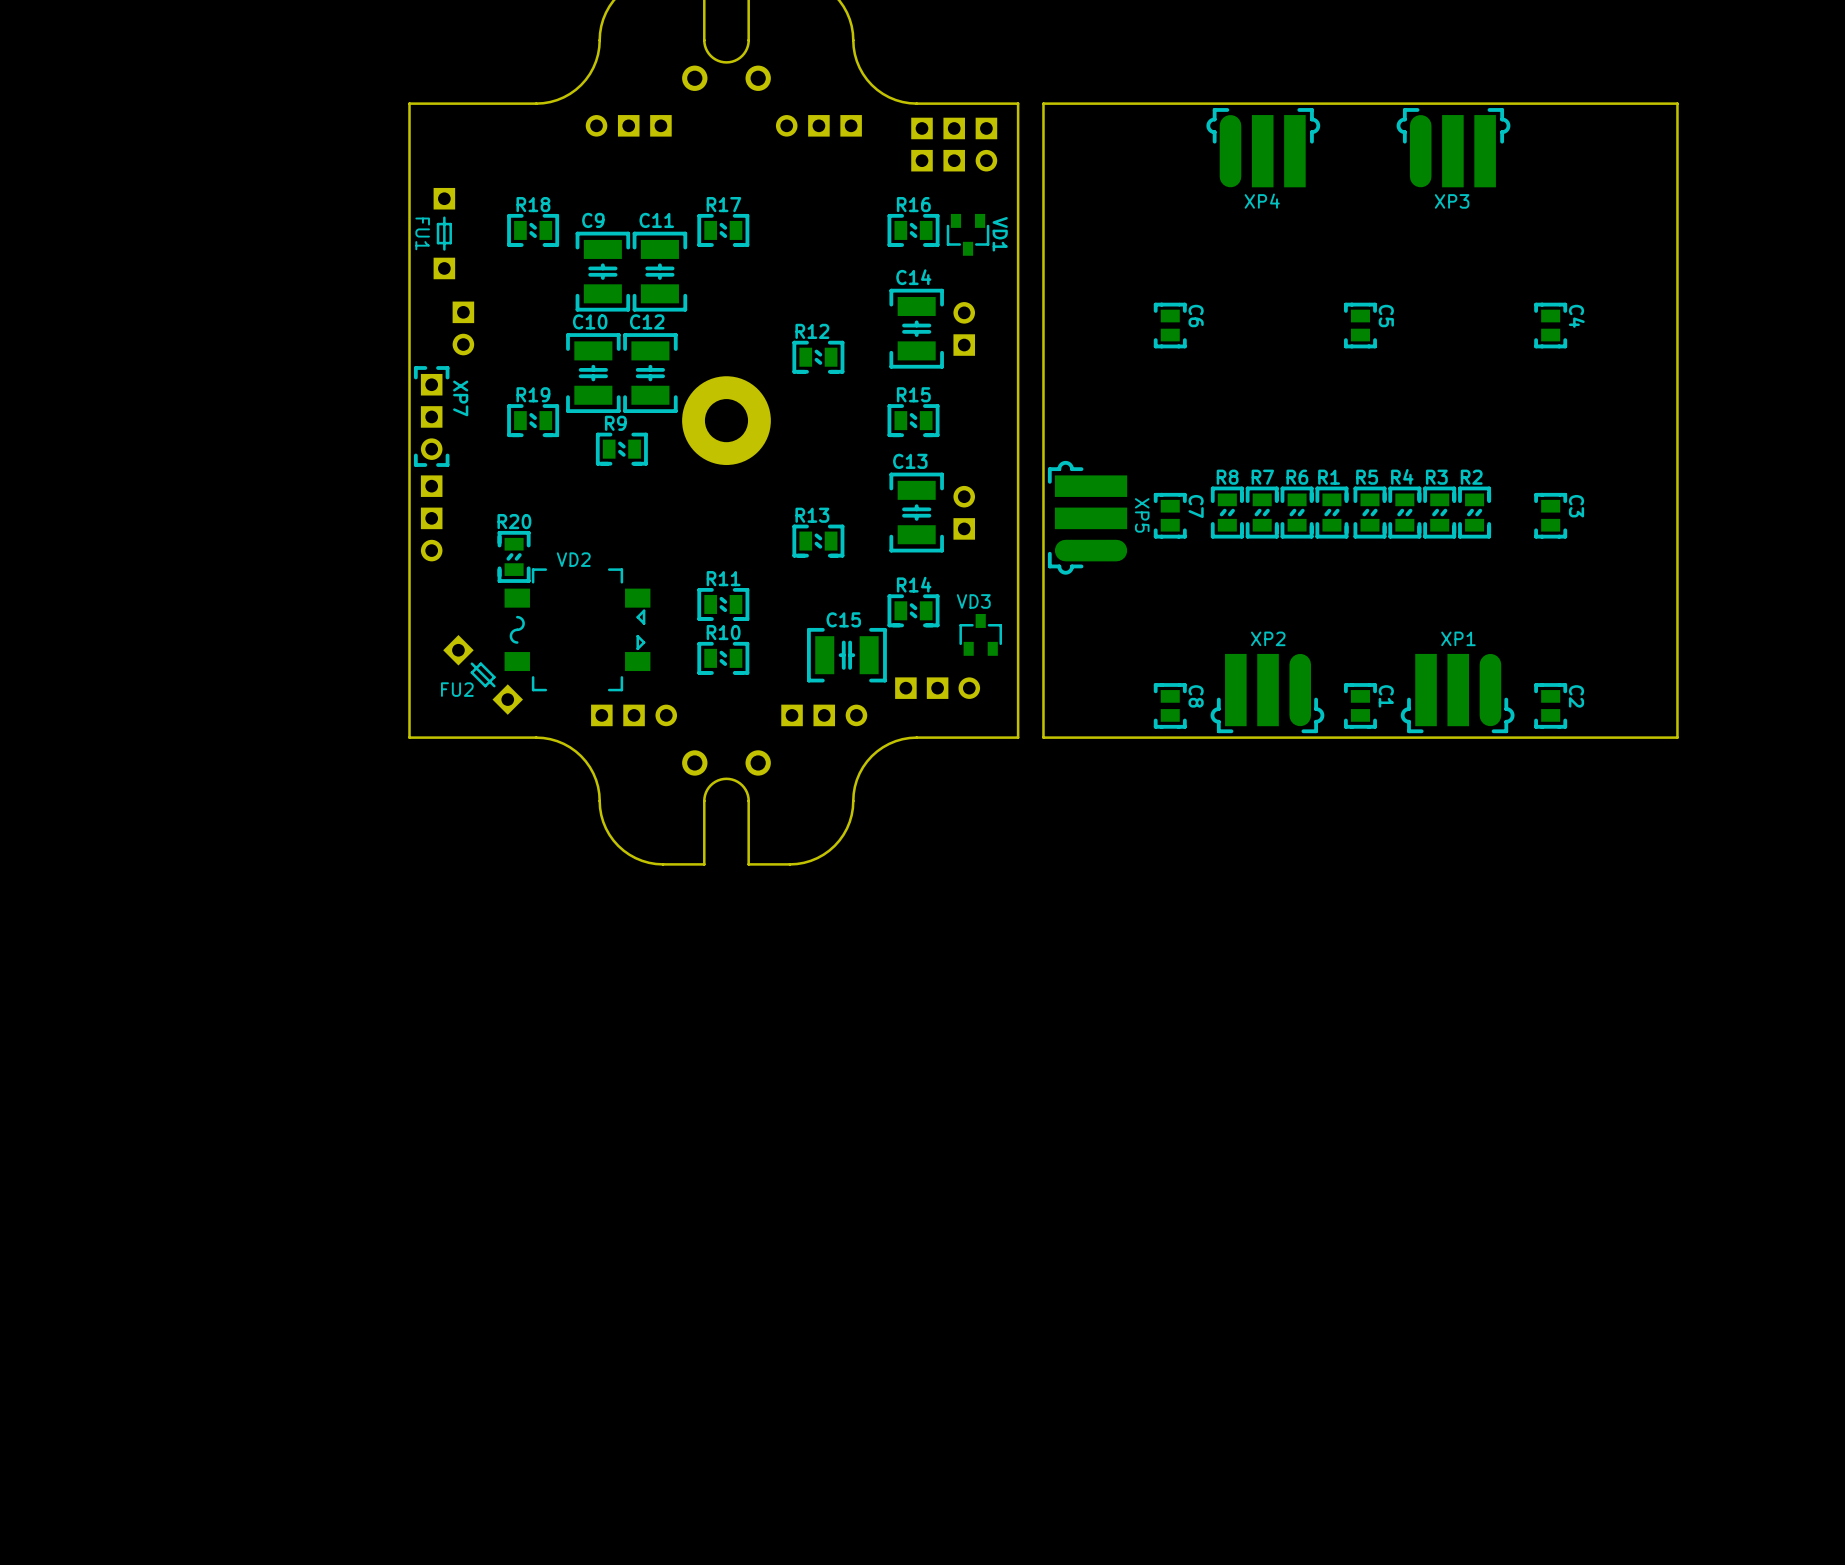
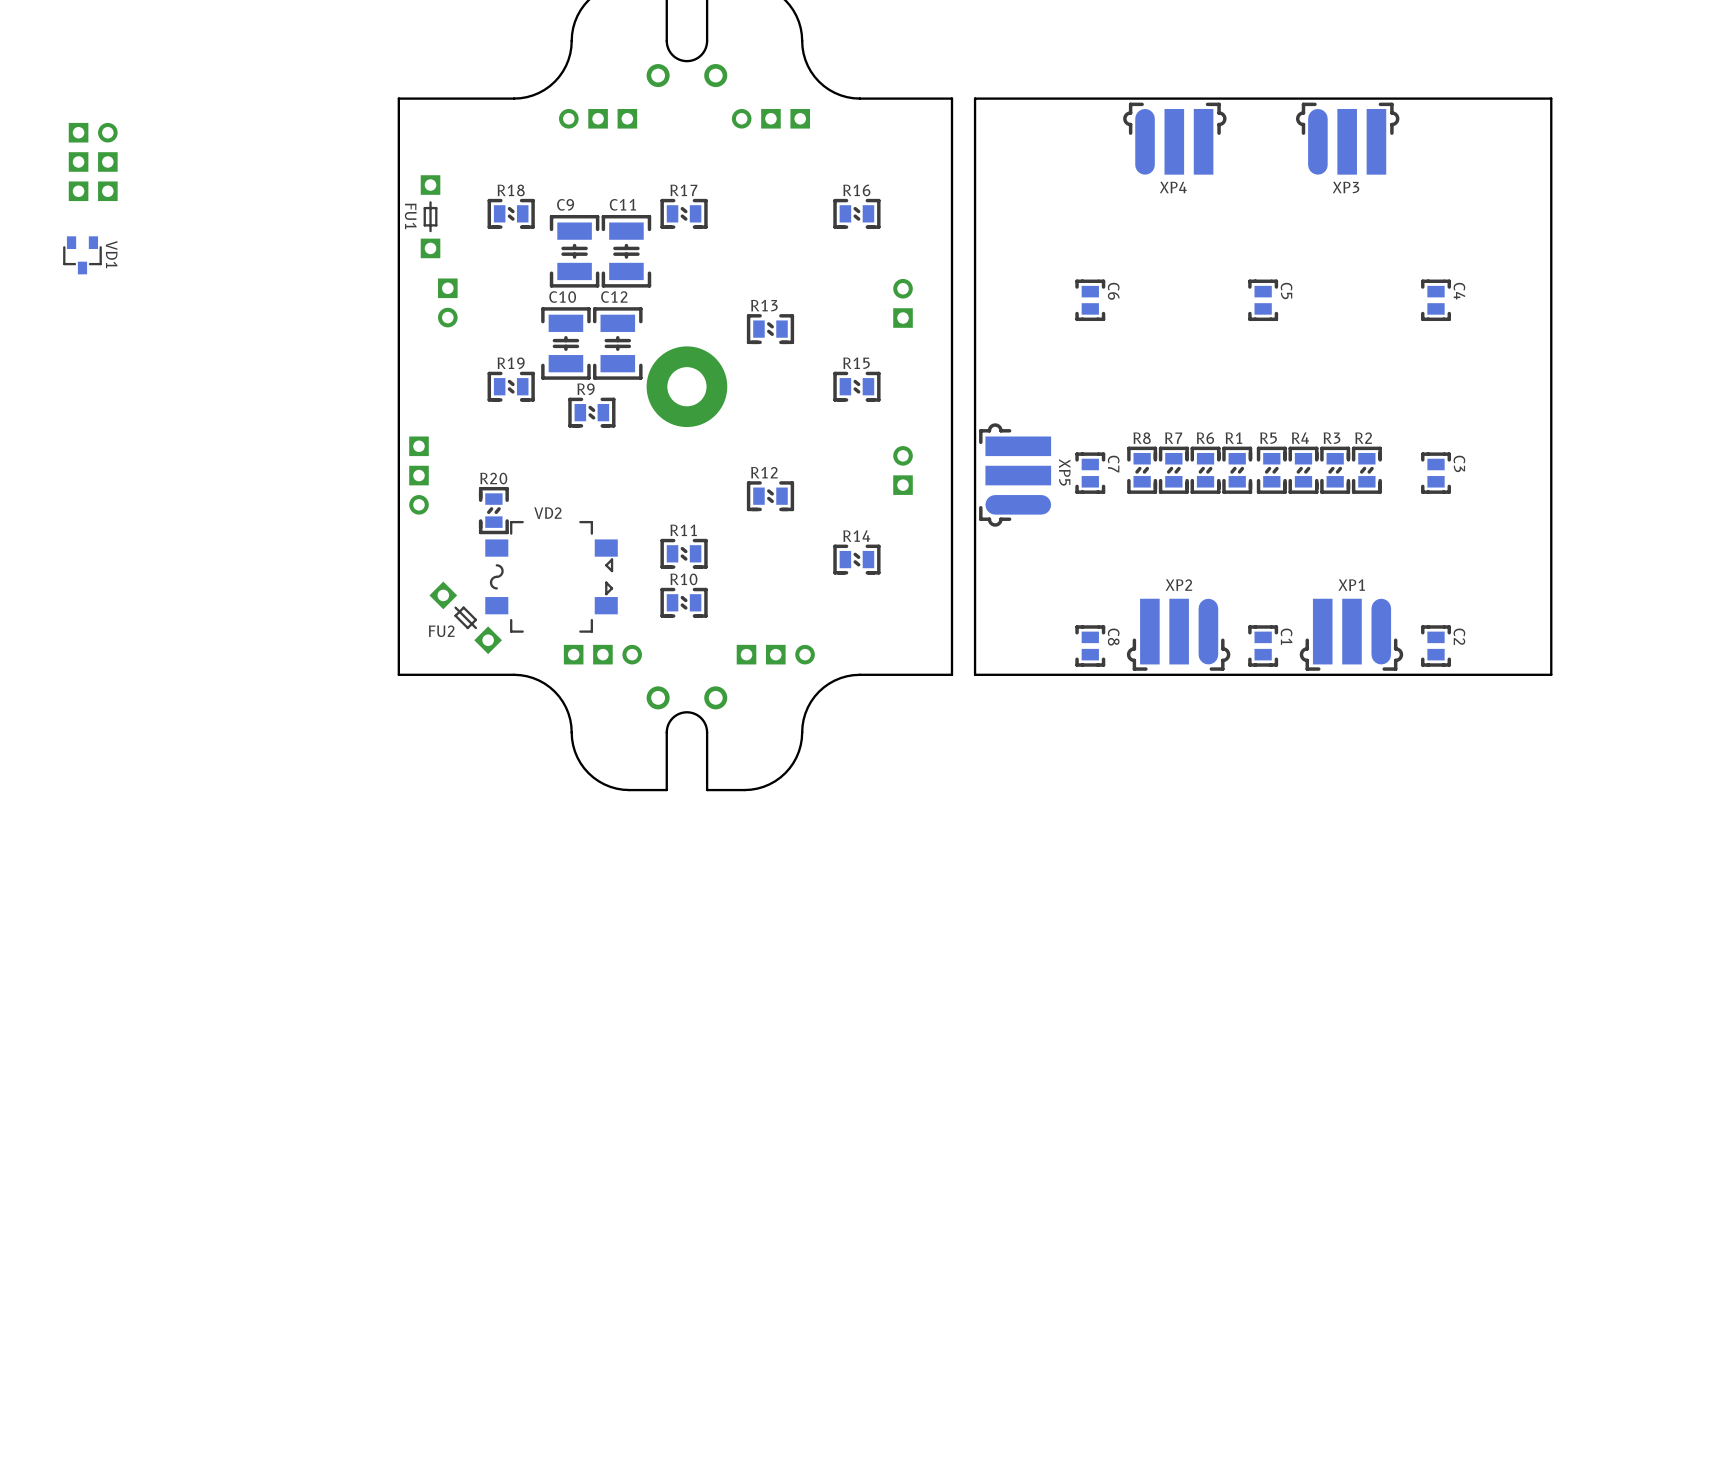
part: (954, 144) -> none
part: none -> (93, 161)
VD1 position: (968, 234) -> (82, 255)
C14: (916, 328) -> none
R12 name: R12 (812, 331) -> R13 (764, 305)
XP7: (431, 416) -> none
C13: (916, 512) -> none
R13 name: R13 (812, 515) -> R12 (764, 472)
VD3: (980, 634) -> none
C15: (846, 655) -> none
part: (937, 688) -> none

